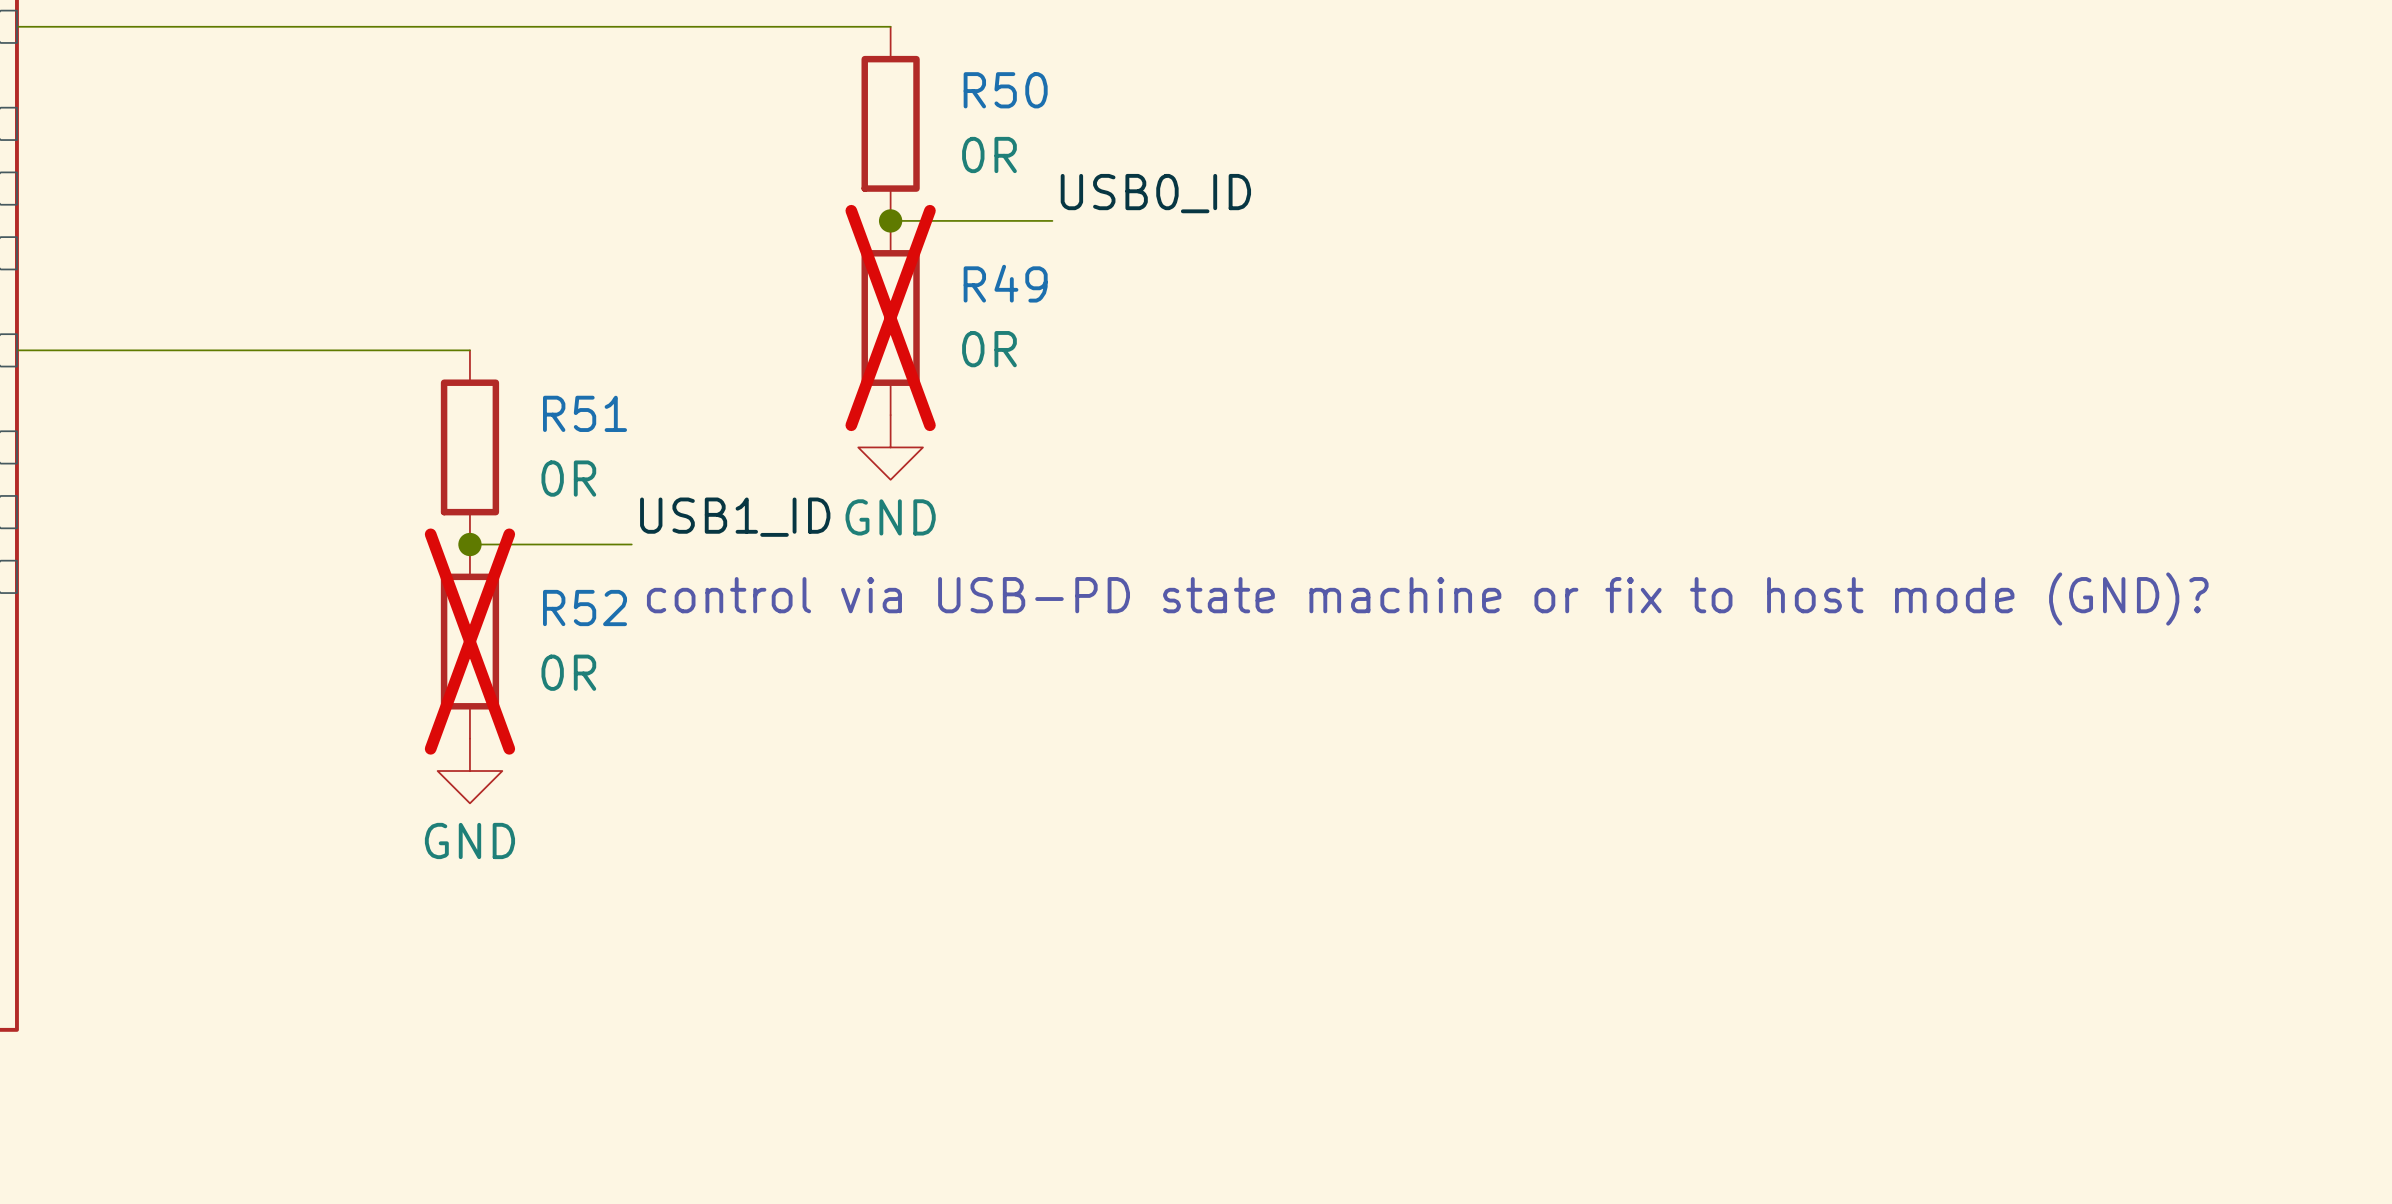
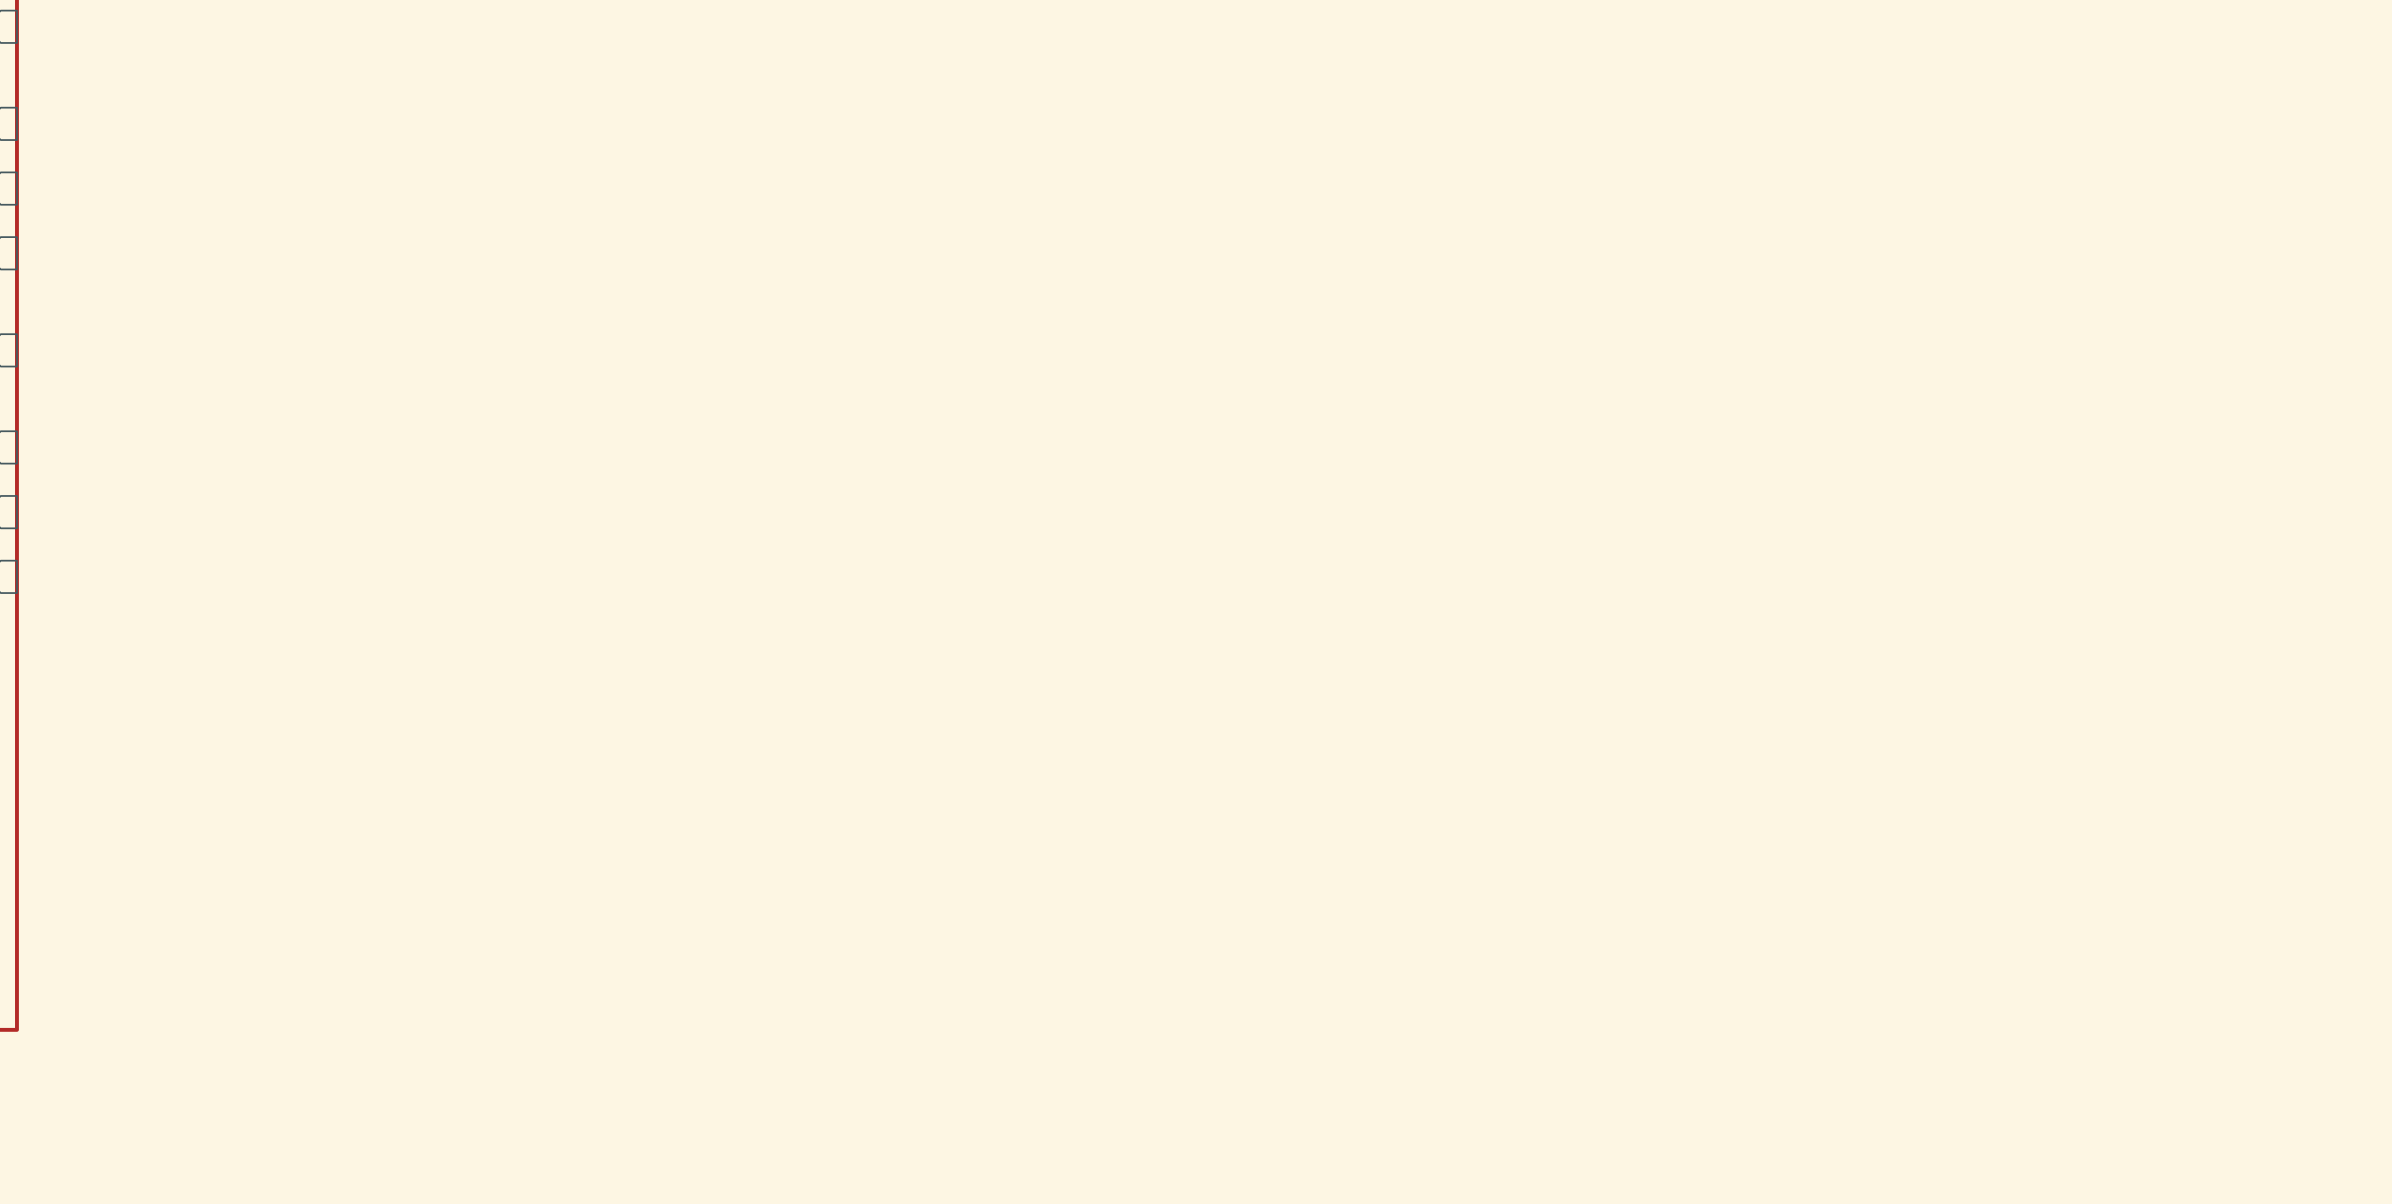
wire: (16, 26) (890, 26) -> none
R50: 0R (890, 123) -> none
label: USB0_ID (1155, 193) -> none
wire: (890, 220) (1052, 220) -> none
junction: (890, 220) -> none
R49: 0R (890, 318) -> none
wire: (16, 350) (469, 350) -> none
R51: 0R (469, 447) -> none
power symbol: GND (890, 447) -> none
label: USB1_ID (735, 517) -> none
wire: (469, 544) (631, 544) -> none
junction: (469, 544) -> none
text: control via USB-PD state machine or fix to host mode (GND)? (1427, 599) -> none
R52: 0R (469, 641) -> none
power symbol: GND (469, 771) -> none

